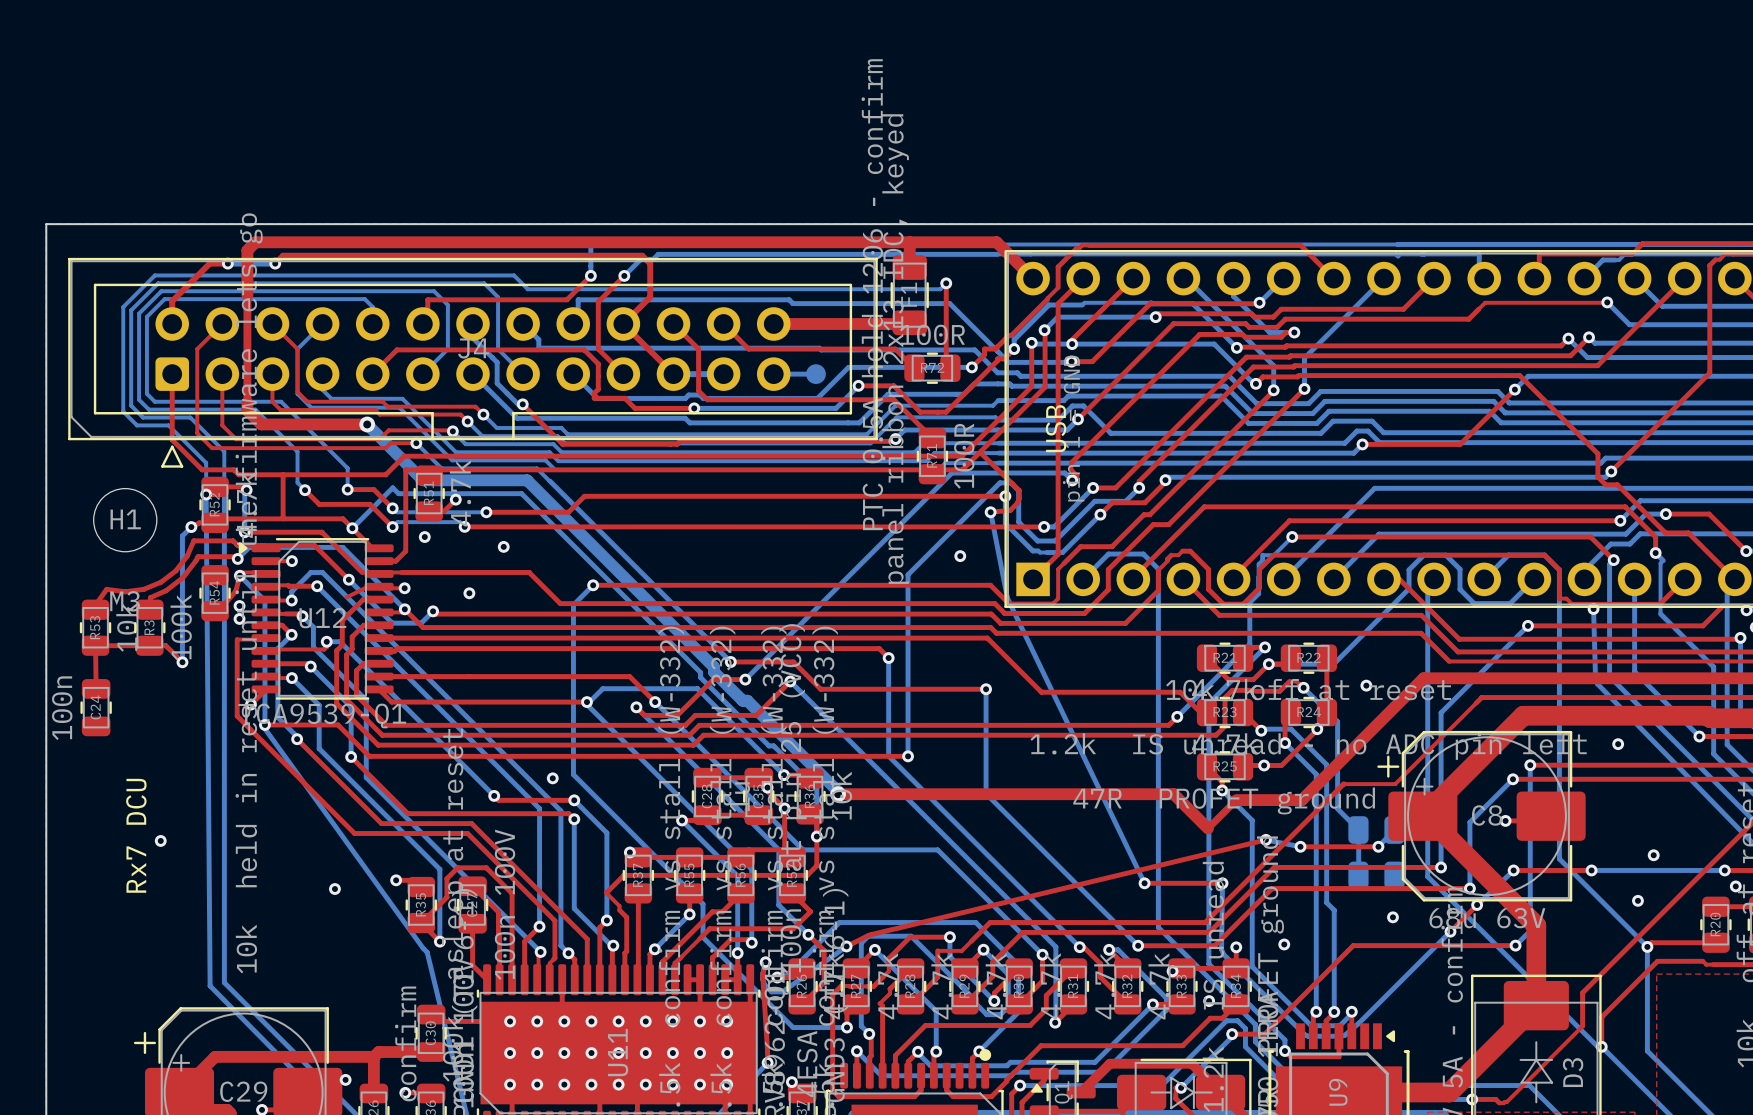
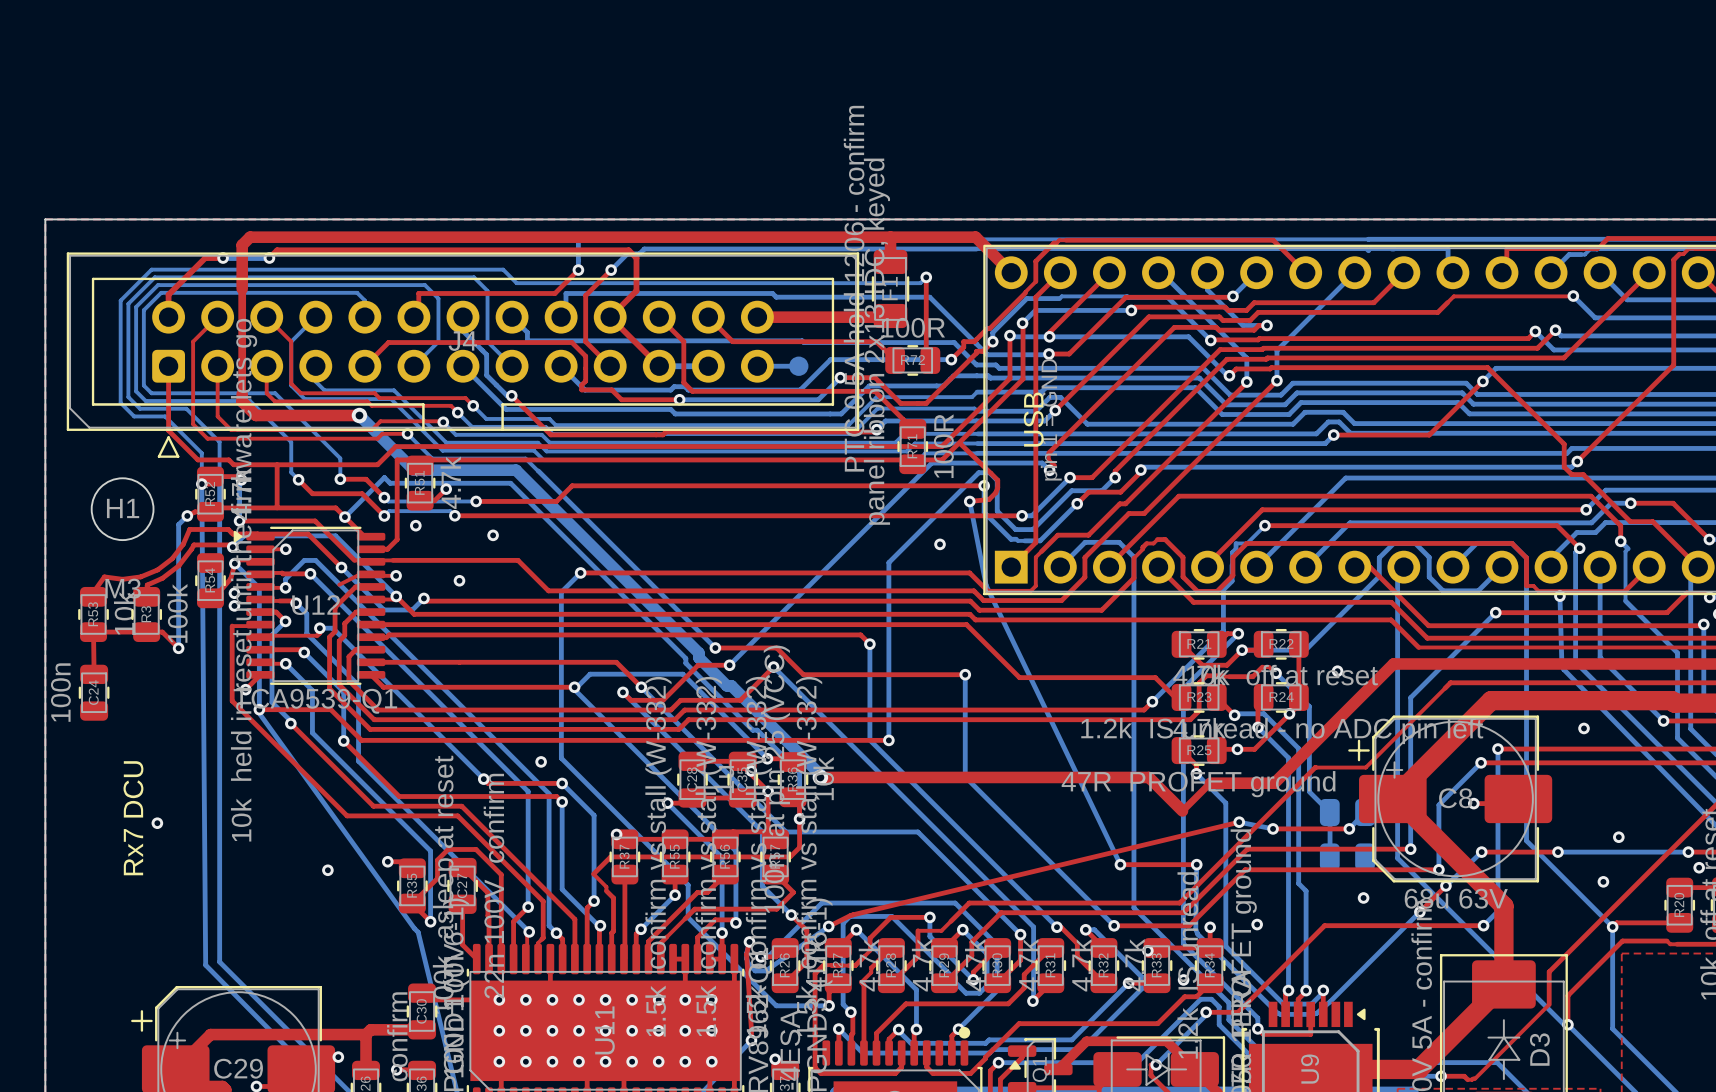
C27 value: 100n 100V (505, 904) -> 22n 100V confirm (493, 886)

